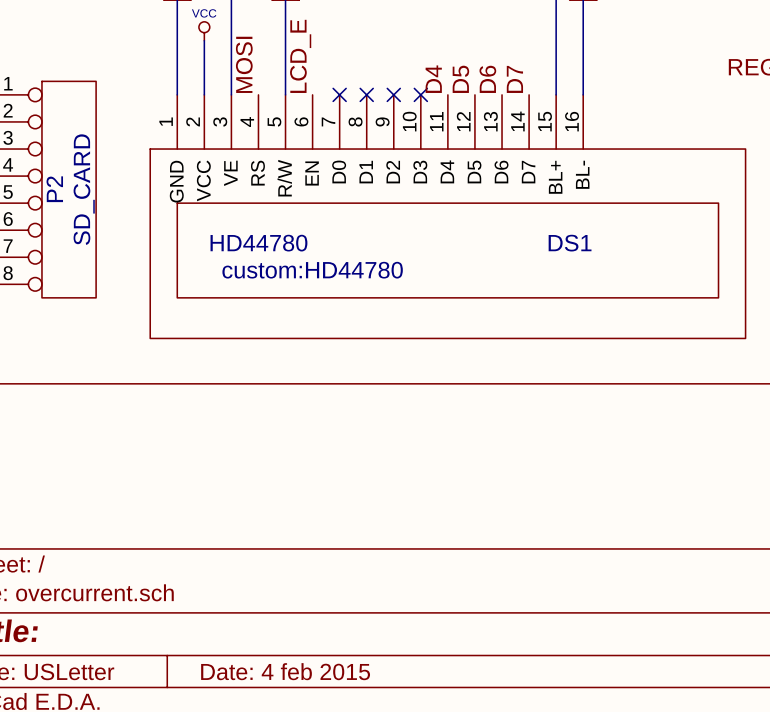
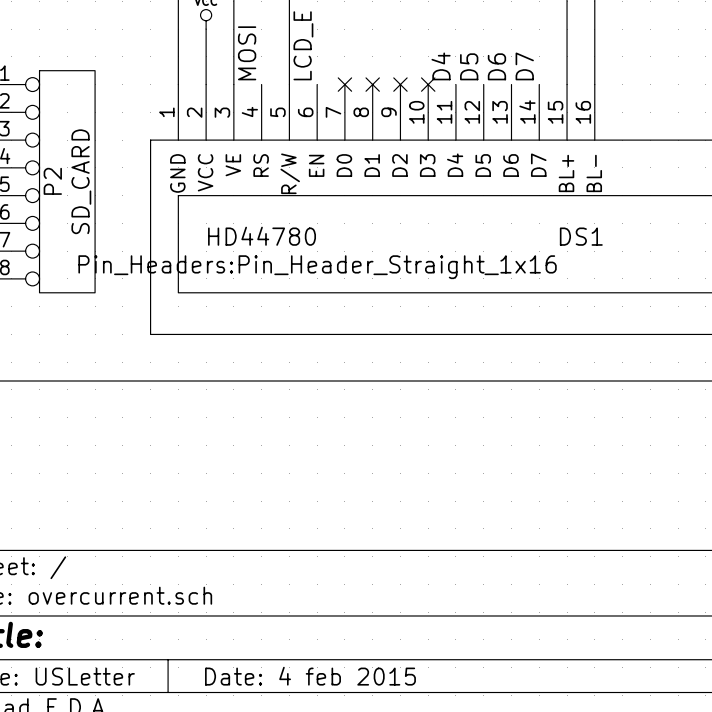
DS1 text: custom:HD44780 (312, 270) -> Pin_Headers:Pin_Header_Straight_1x16 (317, 267)

